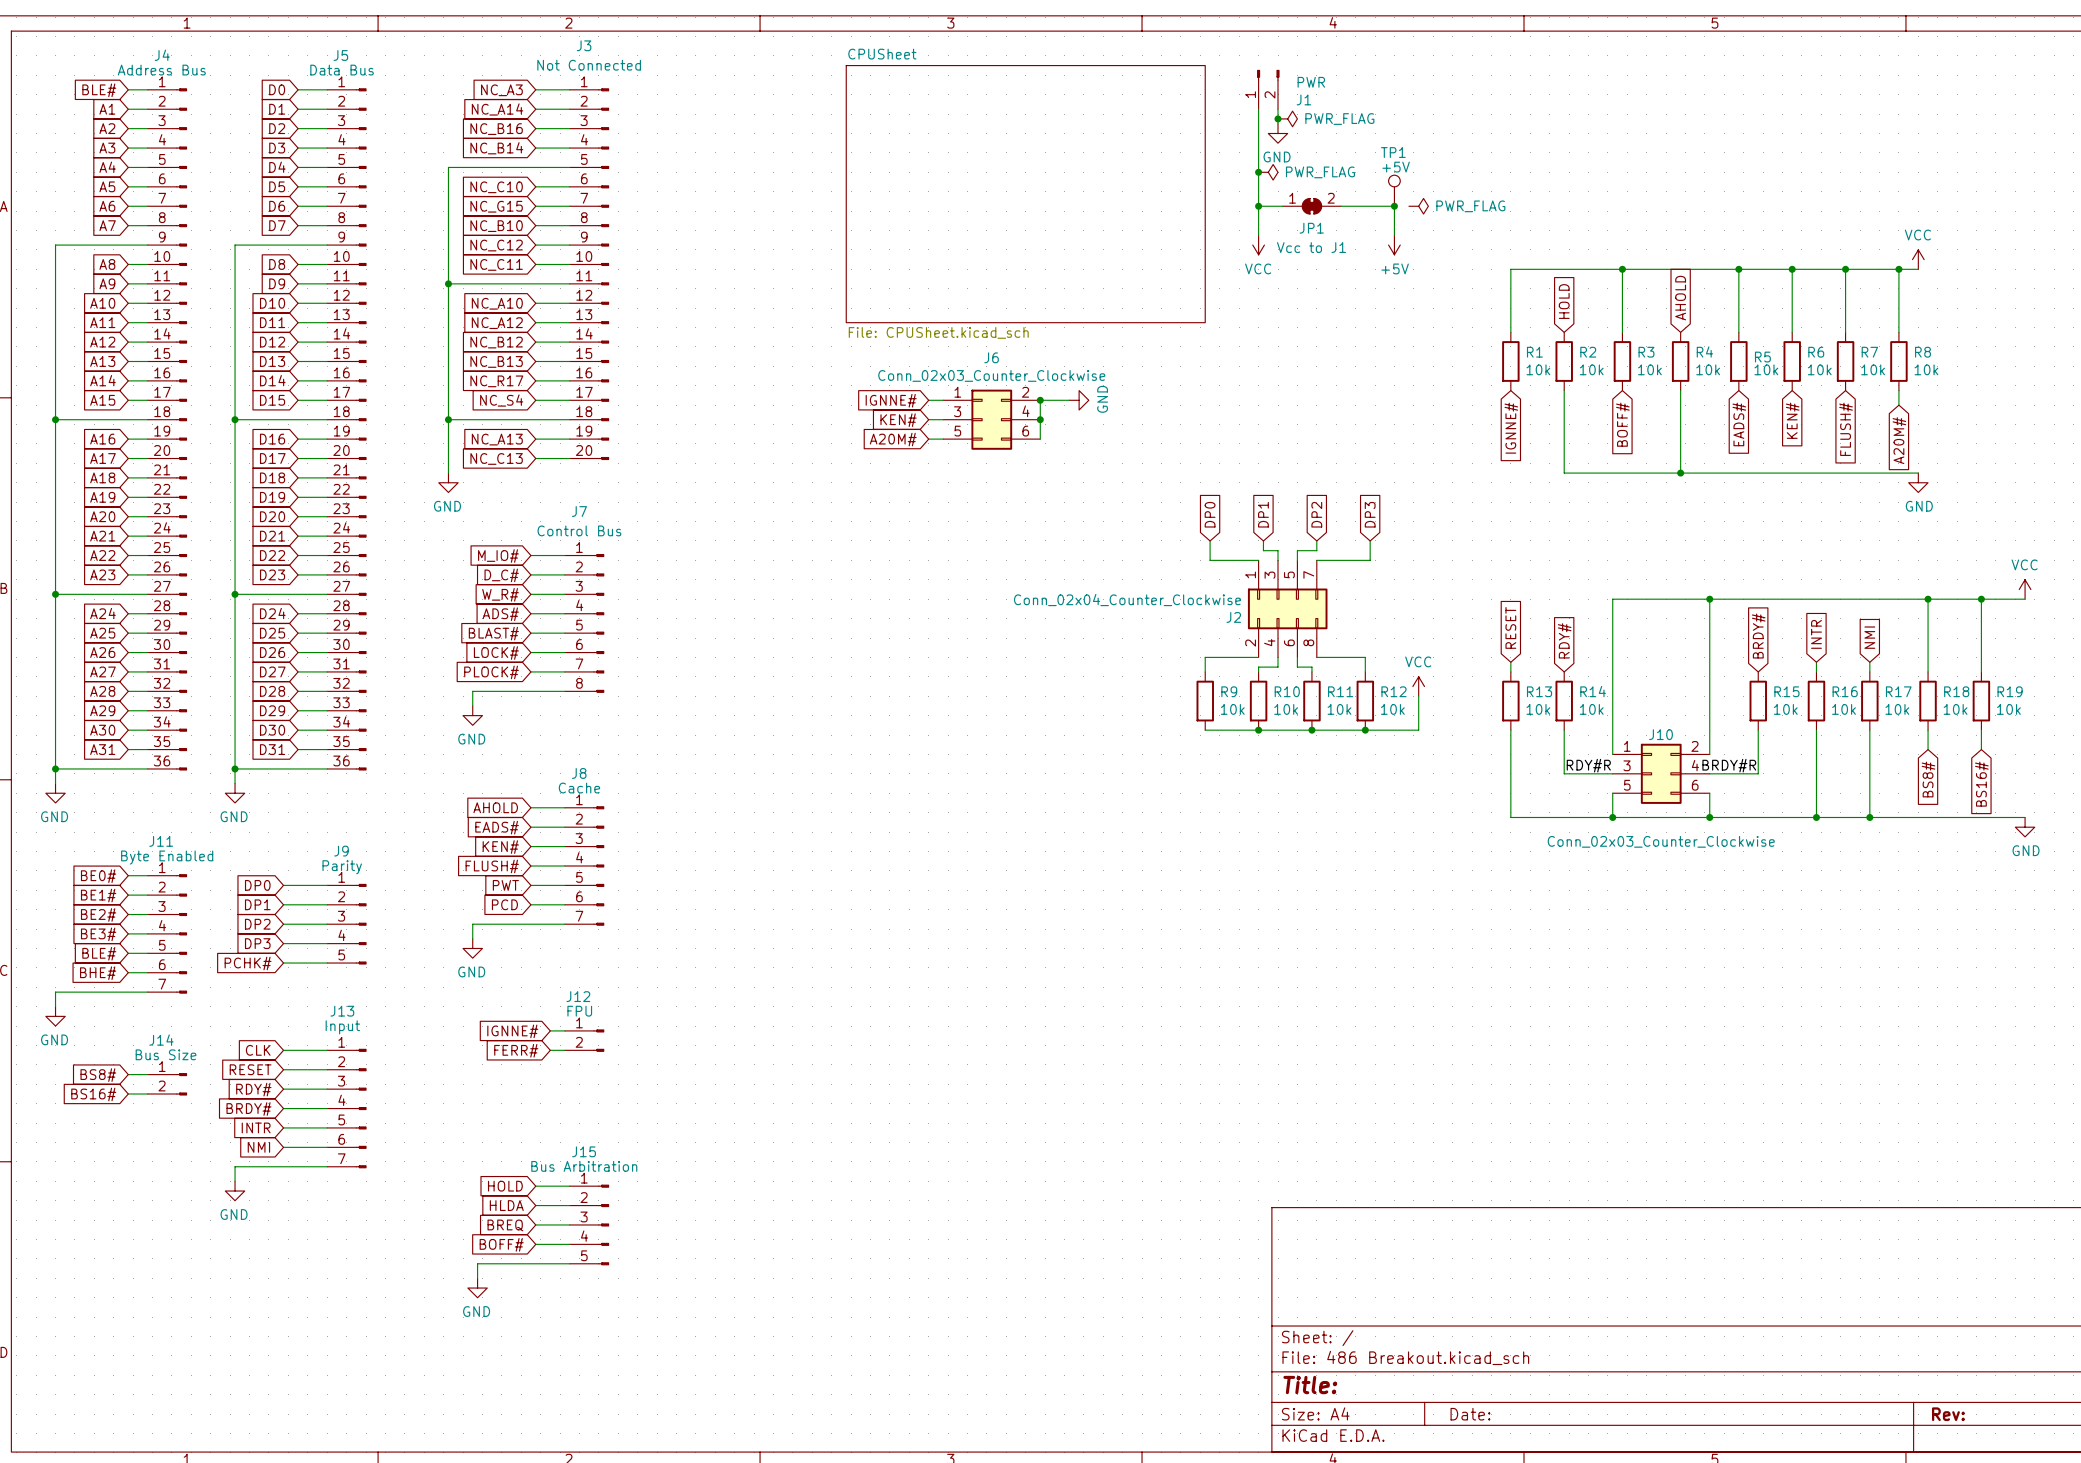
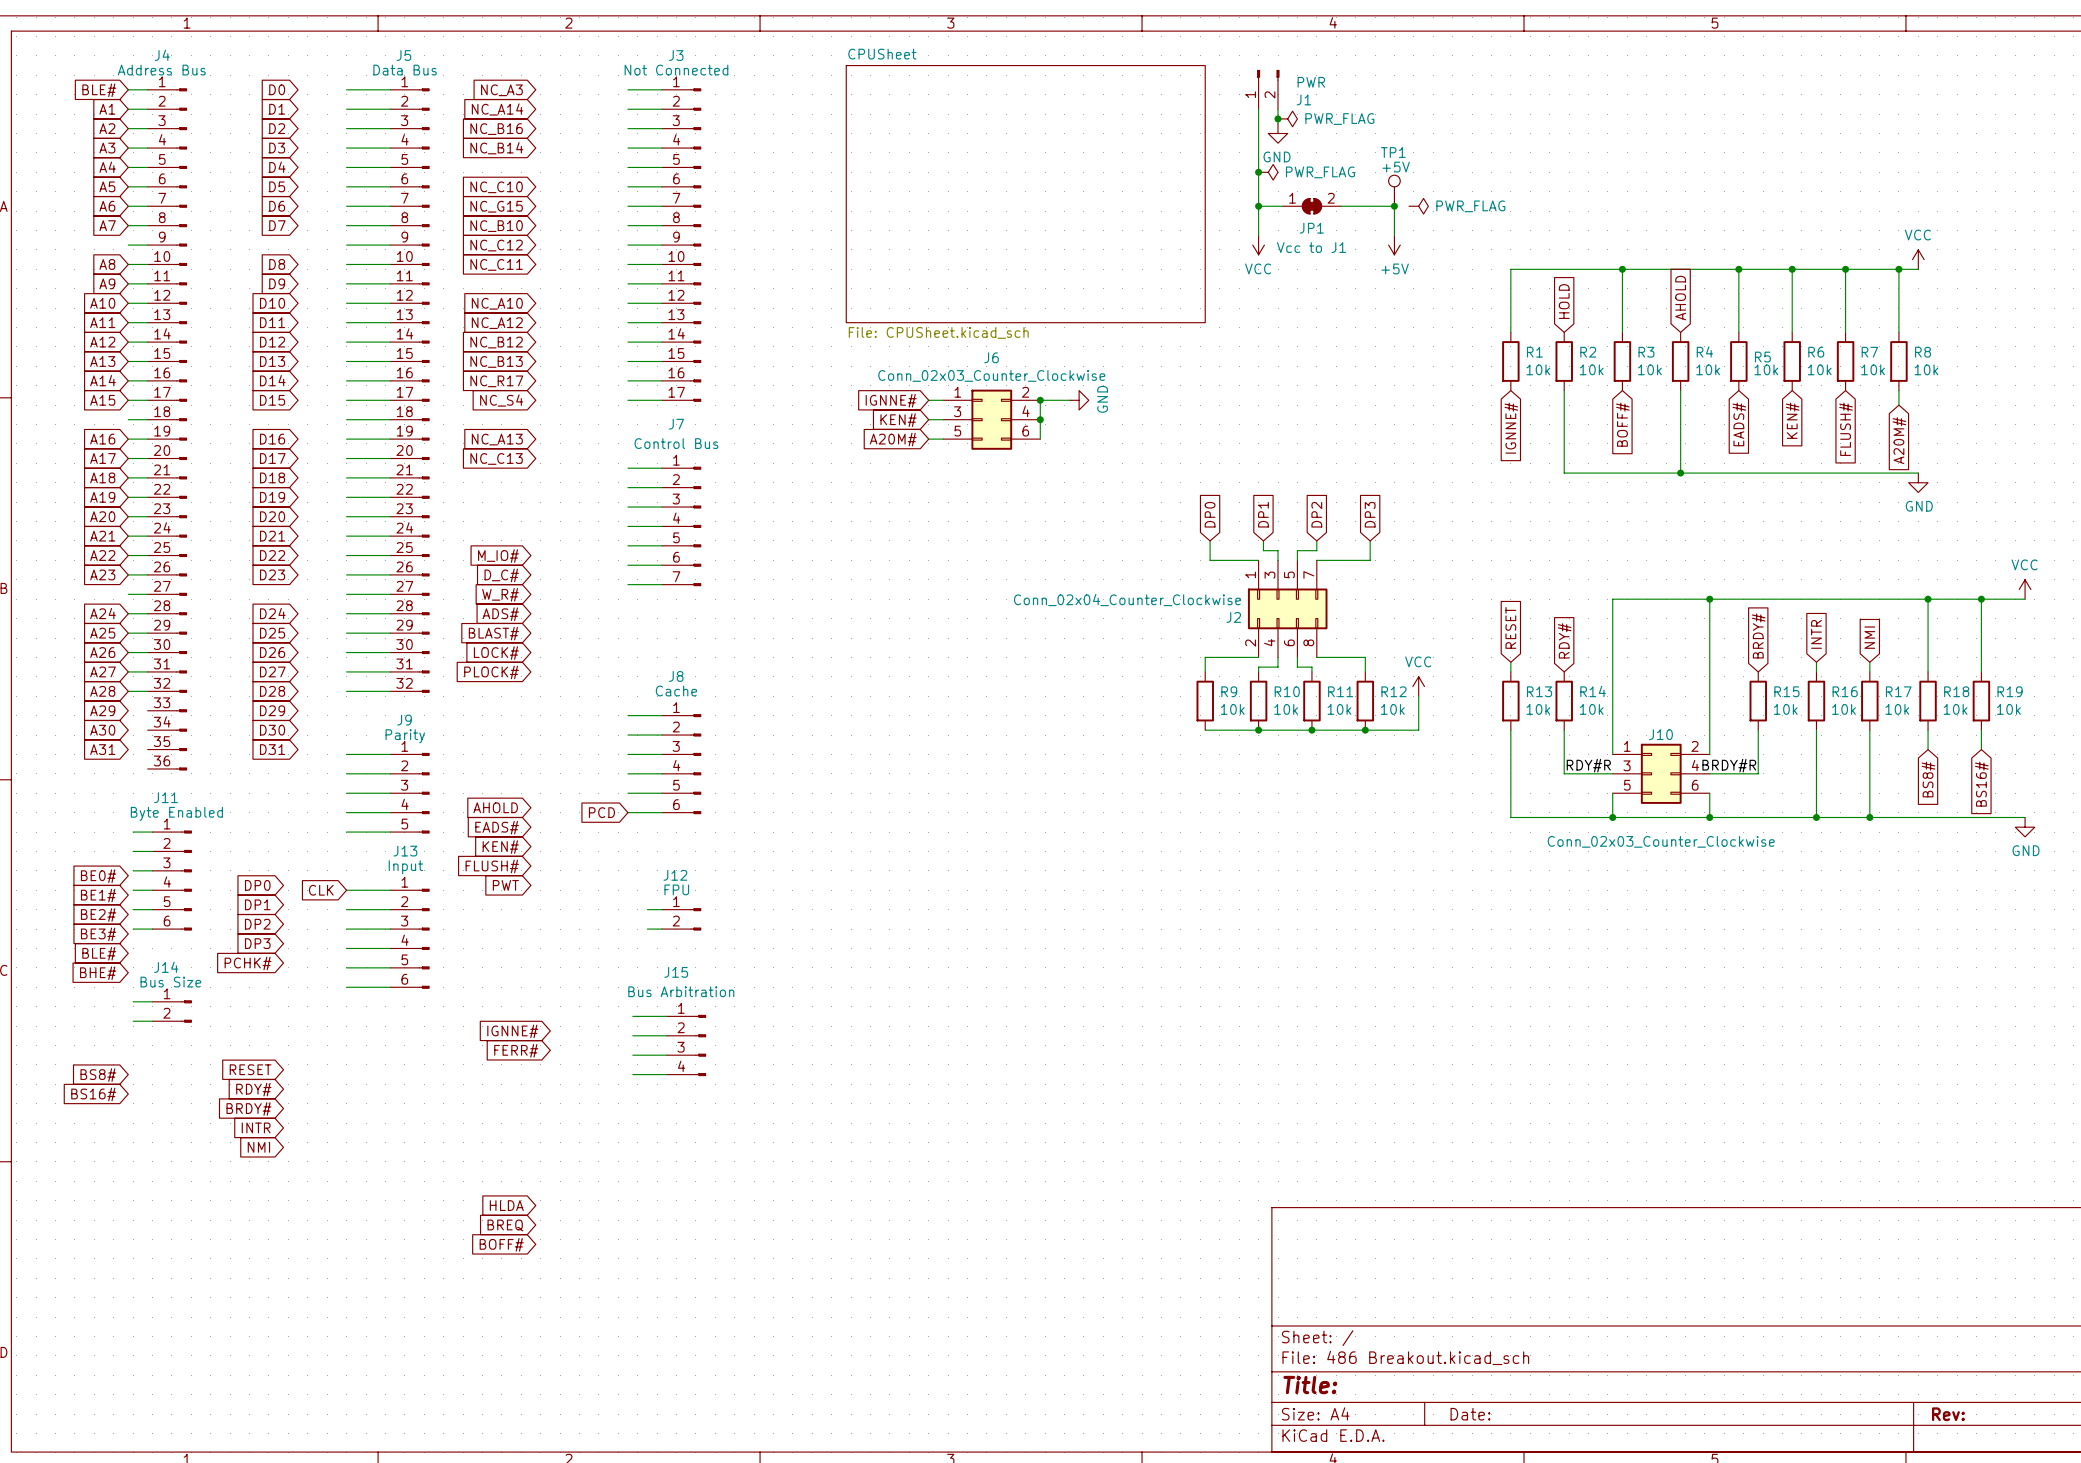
J3 name position: J3 (584, 45) -> J3 (676, 55)
J5 name position: J5 (340, 55) -> J5 (403, 55)
J3 value position: Not Connected (589, 65) -> Not Connected (676, 70)
J5 value position: Data Bus (342, 70) -> Data Bus (405, 70)
J5 symbol: [327, 88, 367, 771] -> [390, 88, 430, 693]
J3 symbol: [569, 88, 610, 461] -> [661, 88, 702, 402]
wire: (298, 89) (327, 89) -> none
wire: none -> (346, 89) (390, 89)
wire: (535, 89) (569, 89) -> (627, 89) (661, 89)
wire: (298, 109) (327, 109) -> none
wire: none -> (346, 109) (390, 109)
wire: (535, 109) (569, 109) -> (627, 109) (661, 109)
wire: (298, 128) (327, 128) -> none
wire: none -> (346, 128) (390, 128)
wire: (535, 128) (569, 128) -> (627, 128) (661, 128)
wire: (298, 148) (327, 148) -> none
wire: none -> (346, 148) (390, 148)
wire: (535, 148) (569, 148) -> (627, 148) (661, 148)
wire: (298, 167) (327, 167) -> none
wire: none -> (346, 167) (390, 167)
wire: (569, 167) (448, 167) (448, 473) -> none
wire: none -> (627, 167) (661, 167)
wire: (298, 186) (327, 186) -> none
wire: none -> (346, 186) (390, 186)
wire: (535, 186) (569, 186) -> (627, 186) (661, 186)
wire: (298, 206) (327, 206) -> none
wire: none -> (346, 206) (390, 206)
wire: (535, 206) (569, 206) -> (627, 206) (661, 206)
wire: (298, 225) (327, 225) -> none
wire: none -> (346, 225) (390, 225)
wire: (535, 225) (569, 225) -> (627, 225) (661, 225)
wire: (128, 245) (55, 245) (55, 783) -> none
wire: (327, 245) (235, 245) (235, 783) -> none
wire: none -> (346, 245) (390, 245)
wire: (535, 245) (569, 245) -> (627, 245) (661, 245)
wire: (298, 264) (327, 264) -> none
wire: none -> (346, 264) (390, 264)
wire: (535, 264) (569, 264) -> (627, 264) (661, 264)
wire: (298, 283) (327, 283) -> none
wire: none -> (346, 283) (390, 283)
wire: (448, 283) (569, 283) -> none
junction: (448, 283) -> none
wire: (298, 303) (327, 303) -> none
wire: none -> (346, 303) (390, 303)
wire: (535, 303) (569, 303) -> (627, 303) (661, 303)
wire: (298, 322) (327, 322) -> none
wire: none -> (346, 322) (390, 322)
wire: (535, 322) (569, 322) -> (627, 322) (661, 322)
wire: (298, 342) (327, 342) -> none
wire: none -> (346, 342) (390, 342)
wire: (535, 342) (569, 342) -> (627, 342) (661, 342)
wire: (298, 361) (327, 361) -> none
wire: none -> (346, 361) (390, 361)
wire: (535, 361) (569, 361) -> (627, 361) (661, 361)
wire: (298, 380) (327, 380) -> none
wire: none -> (346, 380) (390, 380)
wire: (535, 380) (569, 380) -> (627, 380) (661, 380)
wire: (298, 400) (327, 400) -> none
wire: none -> (346, 400) (390, 400)
wire: (535, 400) (569, 400) -> (627, 400) (661, 400)
wire: (55, 419) (128, 419) -> none
junction: (55, 419) -> none
wire: (235, 419) (327, 419) -> none
junction: (235, 419) -> none
wire: none -> (346, 419) (390, 419)
wire: (448, 419) (569, 419) -> none
junction: (448, 419) -> none
wire: (298, 439) (327, 439) -> none
wire: none -> (346, 439) (390, 439)
wire: (535, 439) (569, 439) -> (627, 283) (661, 283)
wire: (298, 458) (327, 458) -> none
wire: none -> (346, 458) (390, 458)
wire: (535, 458) (569, 458) -> none
wire: (298, 477) (327, 477) -> none
wire: none -> (346, 477) (390, 477)
power symbol: GND (448, 482) -> none
wire: (298, 497) (327, 497) -> none
wire: none -> (346, 497) (390, 497)
wire: (298, 516) (327, 516) -> none
wire: none -> (346, 516) (390, 516)
wire: (298, 536) (327, 536) -> none
wire: none -> (346, 536) (390, 536)
J7 symbol: [564, 553, 605, 693] -> [661, 466, 702, 587]
wire: (298, 555) (327, 555) -> none
wire: none -> (346, 555) (390, 555)
wire: (530, 555) (564, 555) -> (627, 468) (661, 468)
wire: (298, 574) (327, 574) -> none
wire: none -> (346, 574) (390, 574)
wire: (530, 574) (564, 574) -> (627, 487) (661, 487)
wire: (55, 594) (128, 594) -> none
junction: (55, 594) -> none
wire: (235, 594) (327, 594) -> none
junction: (235, 594) -> none
wire: none -> (346, 594) (390, 594)
wire: (530, 594) (564, 594) -> (627, 507) (661, 507)
wire: (298, 613) (327, 613) -> none
wire: none -> (346, 613) (390, 613)
wire: (530, 613) (564, 613) -> (627, 526) (661, 526)
wire: (298, 633) (327, 633) -> none
wire: none -> (346, 633) (390, 633)
wire: (530, 633) (564, 633) -> (627, 545) (661, 545)
wire: (298, 652) (327, 652) -> none
wire: none -> (346, 652) (390, 652)
wire: (530, 652) (564, 652) -> (627, 565) (661, 565)
wire: (298, 671) (327, 671) -> none
wire: none -> (346, 671) (390, 671)
wire: (530, 671) (564, 671) -> (627, 584) (661, 584)
wire: (298, 691) (327, 691) -> none
wire: none -> (346, 691) (390, 691)
wire: (564, 691) (472, 691) (472, 705) -> none
wire: (128, 710) (147, 710) -> none
wire: (298, 710) (327, 710) -> none
power symbol: GND (472, 715) -> none
wire: (128, 730) (147, 730) -> none
wire: (298, 730) (327, 730) -> none
wire: (128, 749) (147, 749) -> none
wire: (298, 749) (327, 749) -> none
wire: (55, 768) (147, 768) -> none
junction: (55, 768) -> none
wire: (235, 768) (327, 768) -> none
junction: (235, 768) -> none
power symbol: GND (55, 793) -> none
power symbol: GND (235, 793) -> none
J8 symbol: [564, 806, 605, 926] -> [661, 714, 702, 815]
wire: (530, 807) (564, 807) -> (627, 715) (661, 715)
wire: (530, 827) (564, 827) -> (627, 735) (661, 735)
wire: (530, 846) (564, 846) -> (627, 754) (661, 754)
wire: (530, 866) (564, 866) -> (627, 773) (661, 773)
J11 symbol: [147, 874, 188, 994] -> [152, 830, 192, 931]
wire: (128, 875) (147, 875) -> (133, 832) (152, 832)
wire: (283, 885) (327, 885) -> (346, 754) (390, 754)
wire: (530, 885) (564, 885) -> (627, 793) (661, 793)
wire: (128, 895) (147, 895) -> (133, 851) (152, 851)
wire: (283, 904) (327, 904) -> (346, 773) (390, 773)
global label position: PCD (504, 904) -> PCD (601, 812)
wire: (530, 904) (564, 904) -> (627, 812) (661, 812)
wire: (128, 914) (147, 914) -> (133, 870) (152, 870)
wire: (283, 924) (327, 924) -> (346, 793) (390, 793)
J9 position: (346, 924) -> (409, 793)
wire: (564, 924) (472, 924) (472, 938) -> none
wire: (128, 933) (147, 933) -> (133, 890) (152, 890)
wire: (283, 943) (327, 943) -> (346, 812) (390, 812)
power symbol: GND (472, 948) -> none
wire: (128, 953) (147, 953) -> (133, 909) (152, 909)
wire: (283, 963) (327, 963) -> (346, 832) (390, 832)
wire: (128, 972) (147, 972) -> (133, 929) (152, 929)
wire: (147, 992) (55, 992) (55, 1006) -> none
power symbol: GND (55, 1016) -> none
wire: none -> (632, 1016) (666, 1016)
wire: (550, 1030) (564, 1030) -> (647, 909) (661, 909)
wire: none -> (632, 1035) (666, 1035)
J12 position: (584, 1040) -> (681, 919)
J13 symbol: [327, 1048, 367, 1169] -> [390, 888, 430, 989]
global label position: CLK (258, 1050) -> CLK (321, 890)
wire: (283, 1050) (327, 1050) -> (346, 890) (390, 890)
wire: (550, 1050) (564, 1050) -> (647, 929) (661, 929)
wire: (283, 1069) (327, 1069) -> (346, 909) (390, 909)
wire: (128, 1074) (147, 1074) -> (133, 1001) (152, 1001)
J14 position: (167, 1084) -> (172, 1011)
wire: (283, 1089) (327, 1089) -> (346, 929) (390, 929)
wire: (128, 1094) (147, 1094) -> (133, 1021) (152, 1021)
wire: (283, 1108) (327, 1108) -> (346, 948) (390, 948)
wire: (283, 1127) (327, 1127) -> (346, 967) (390, 967)
wire: (283, 1147) (327, 1147) -> (346, 987) (390, 987)
wire: (327, 1166) (235, 1166) (235, 1181) -> none
J15 symbol: [569, 1184, 610, 1266] -> [666, 1014, 707, 1077]
global label: HOLD (505, 1186) -> none
wire: (535, 1186) (569, 1186) -> (632, 1074) (666, 1074)
power symbol: GND (235, 1191) -> none
wire: (535, 1205) (569, 1205) -> (632, 1055) (666, 1055)
wire: (535, 1224) (569, 1224) -> none
wire: (535, 1244) (569, 1244) -> none
wire: (569, 1263) (477, 1263) (477, 1278) -> none
power symbol: GND (477, 1288) -> none

